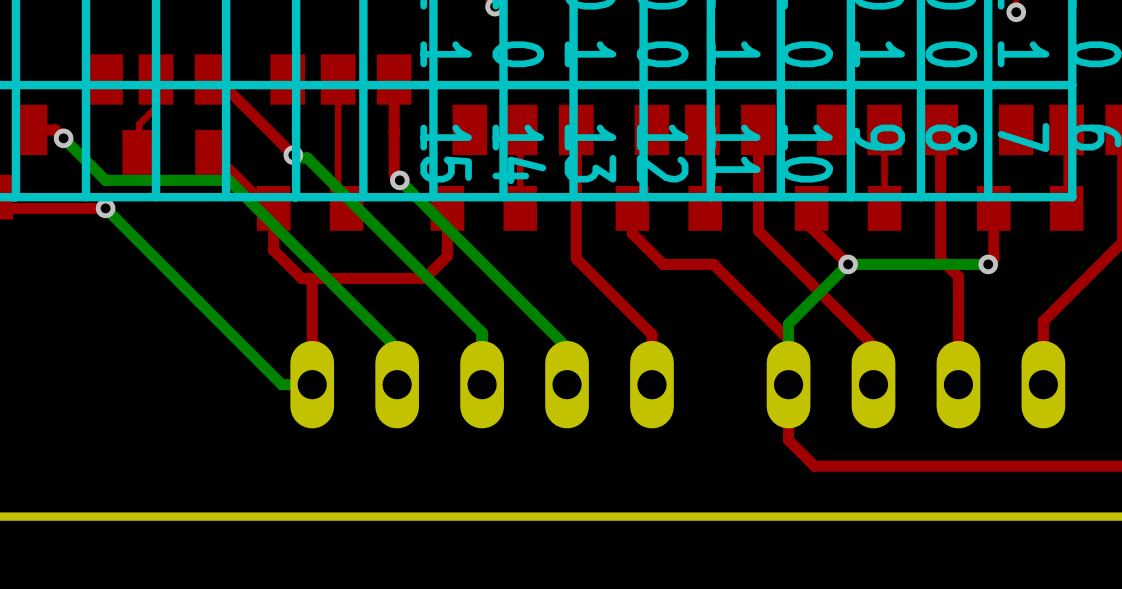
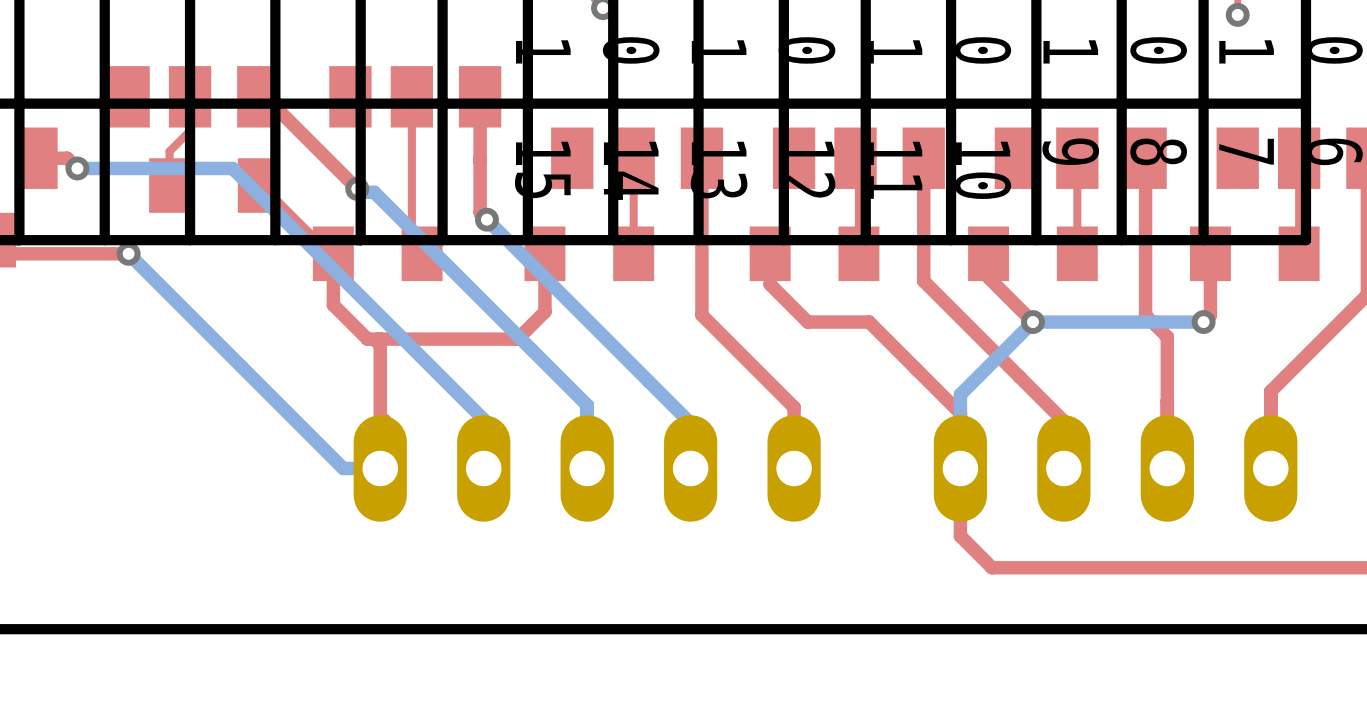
bottom track: (63, 138) (105, 180) (229, 180) (397, 348) -> (77, 168) (232, 168) (483, 419) (483, 424)

